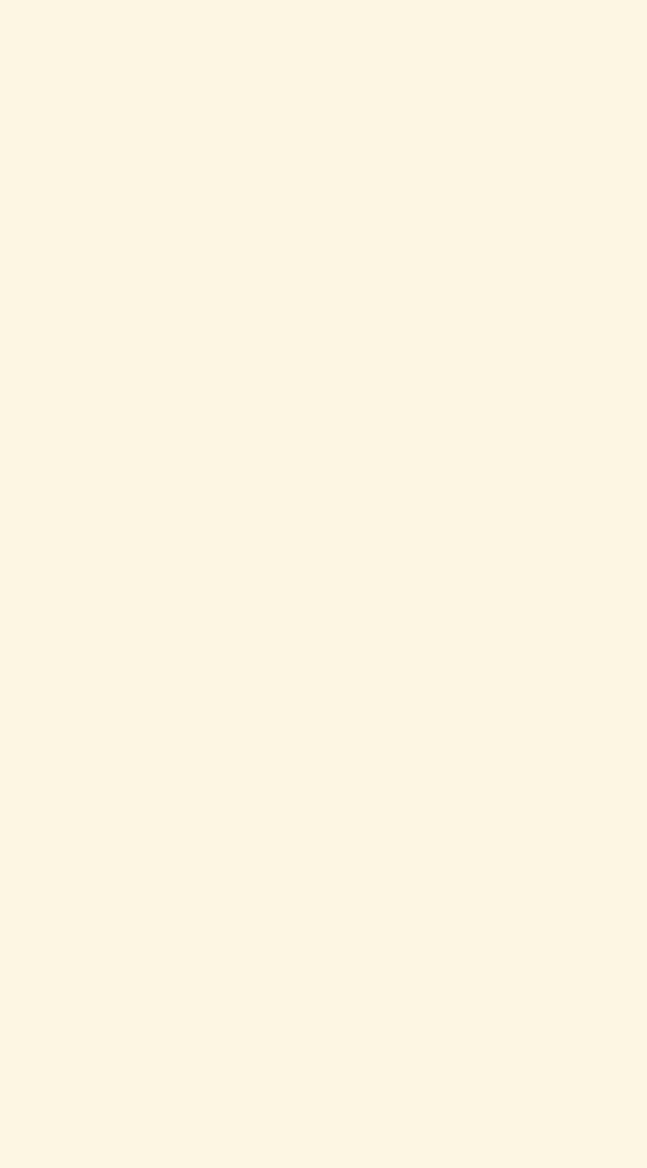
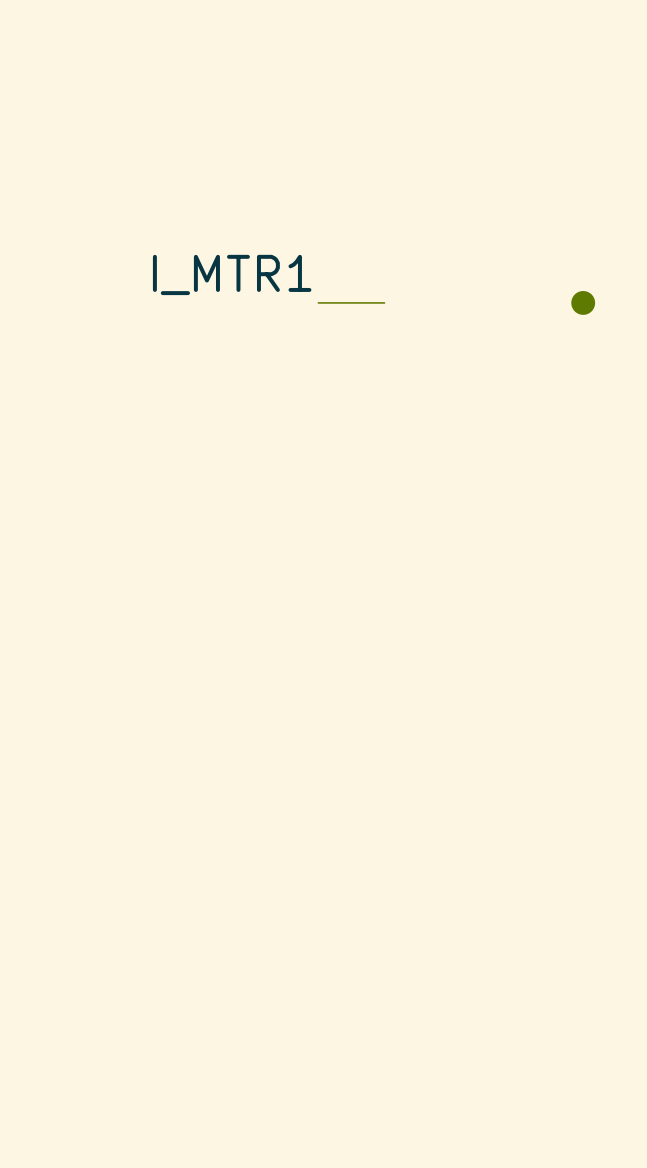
label: none -> I_MTR1 (232, 274)
wire: none -> (318, 302) (384, 302)
junction: none -> (583, 302)

